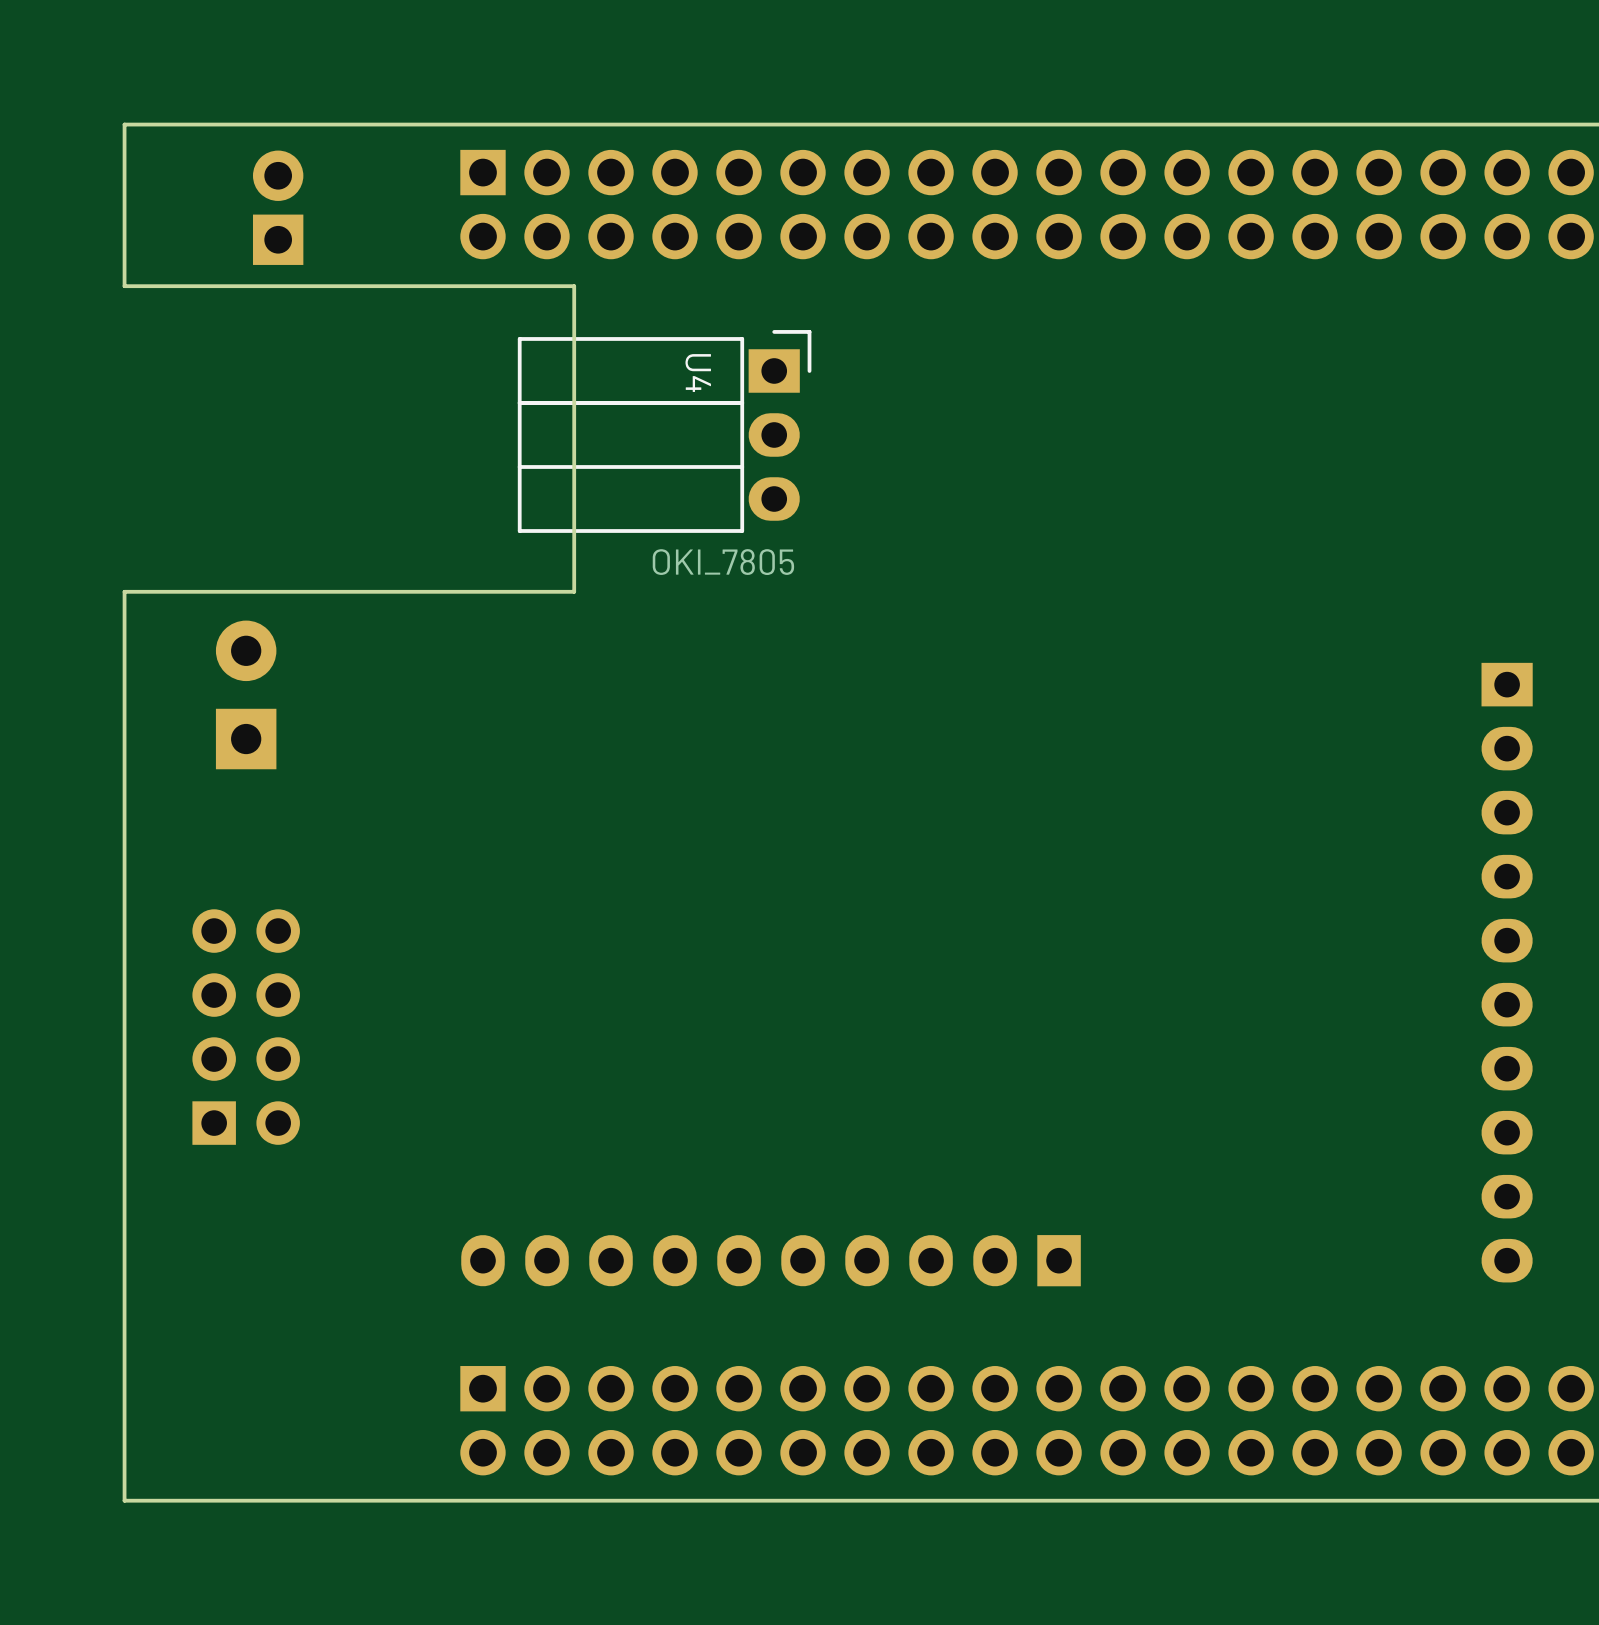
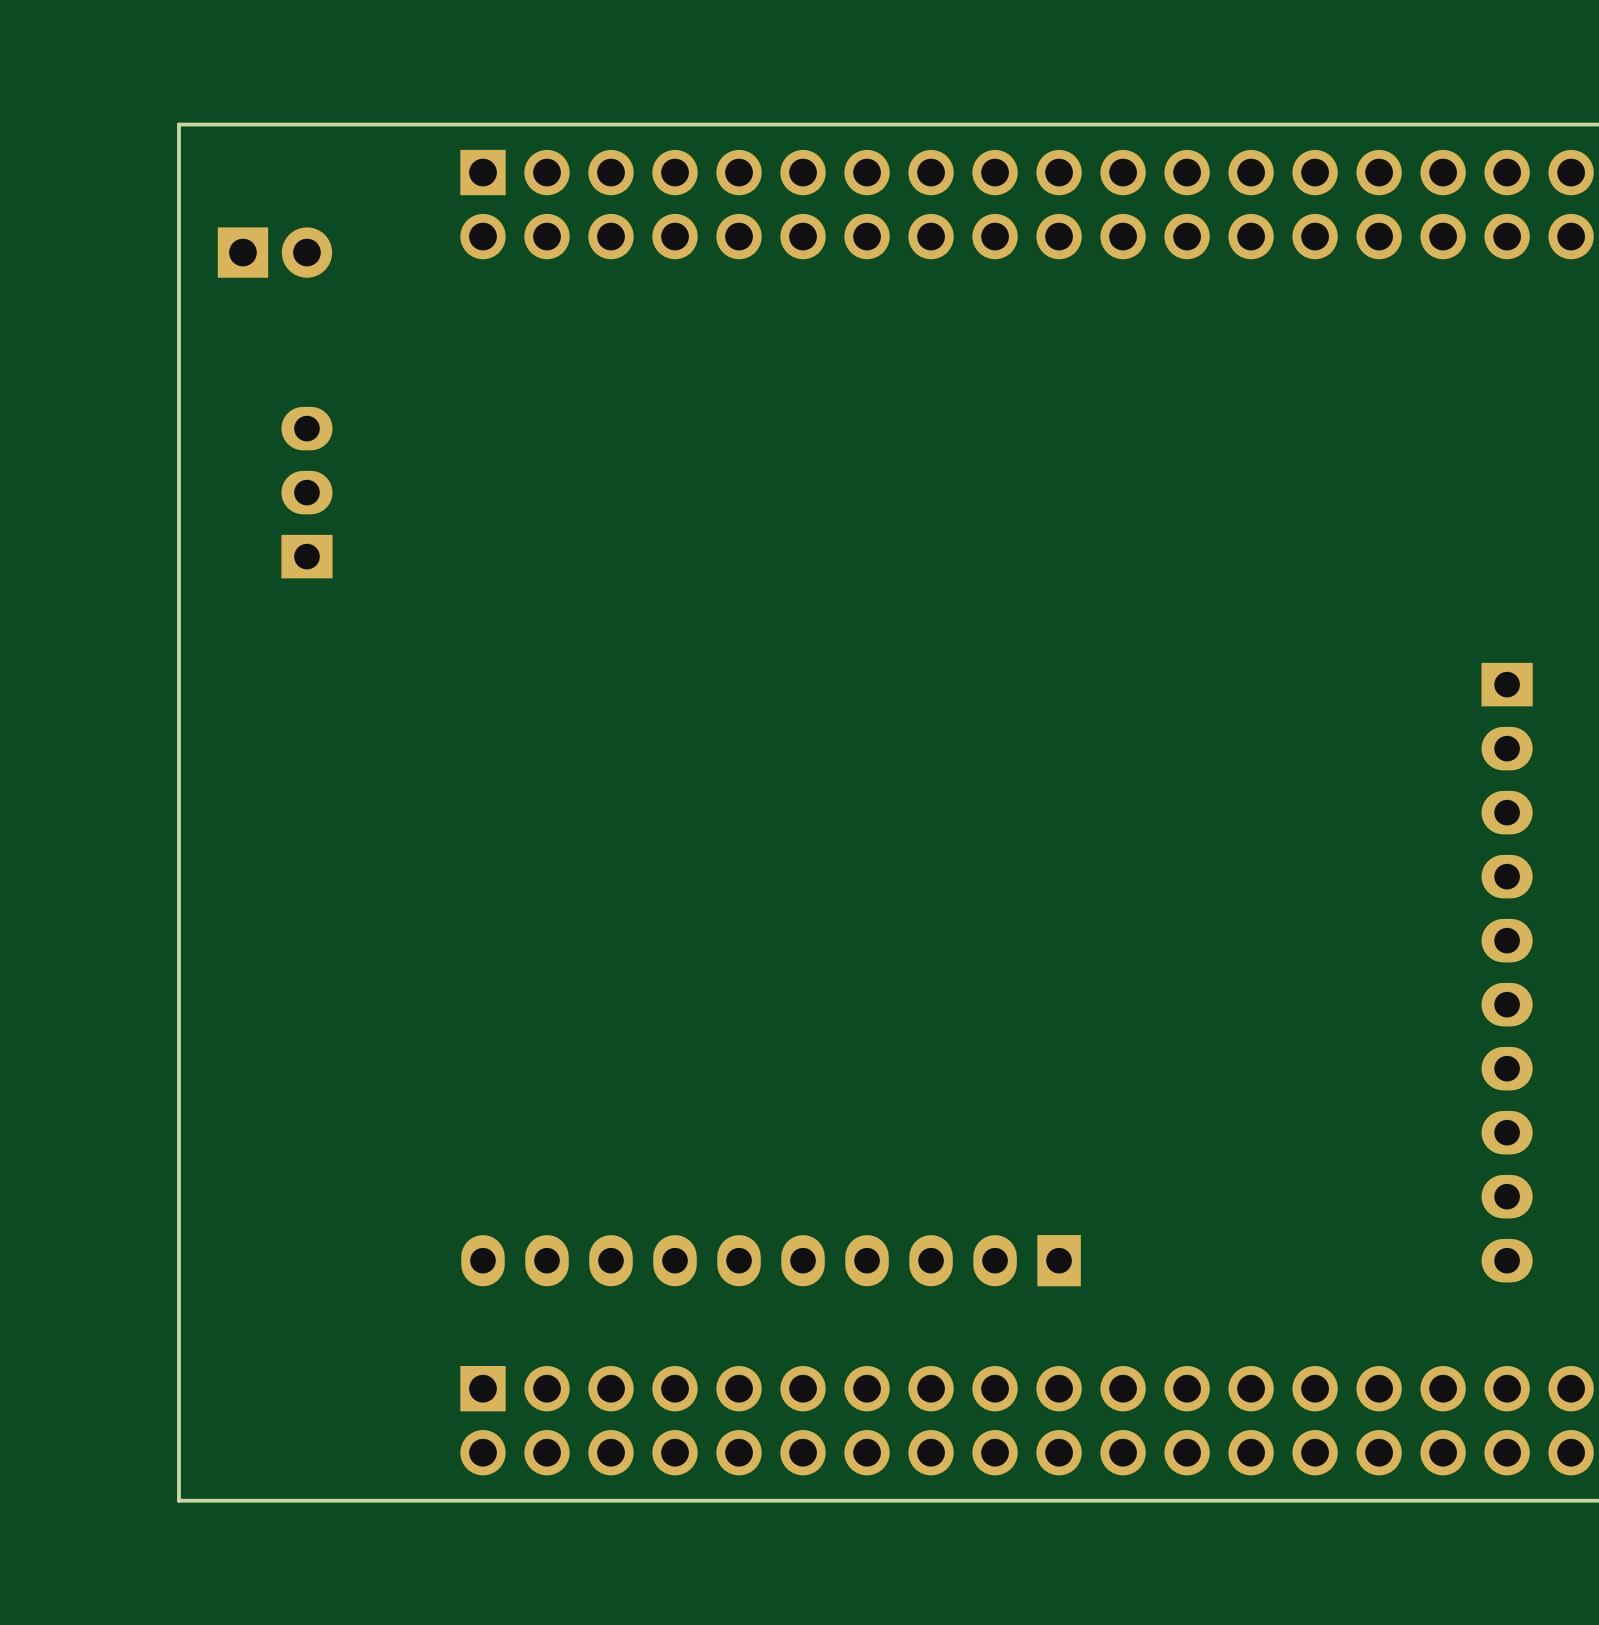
board edge: (178, 124) (124, 124) (124, 286) (574, 286) (574, 591) (124, 591) (124, 1500) (178, 1500) -> (178, 124) (178, 1500)
part rotation: 0° (278, 207) -> 90° clockwise (274, 252)
U4 side: bottom (664, 431) -> top (306, 492)
part: (246, 694) -> none
part: (246, 1027) -> none

